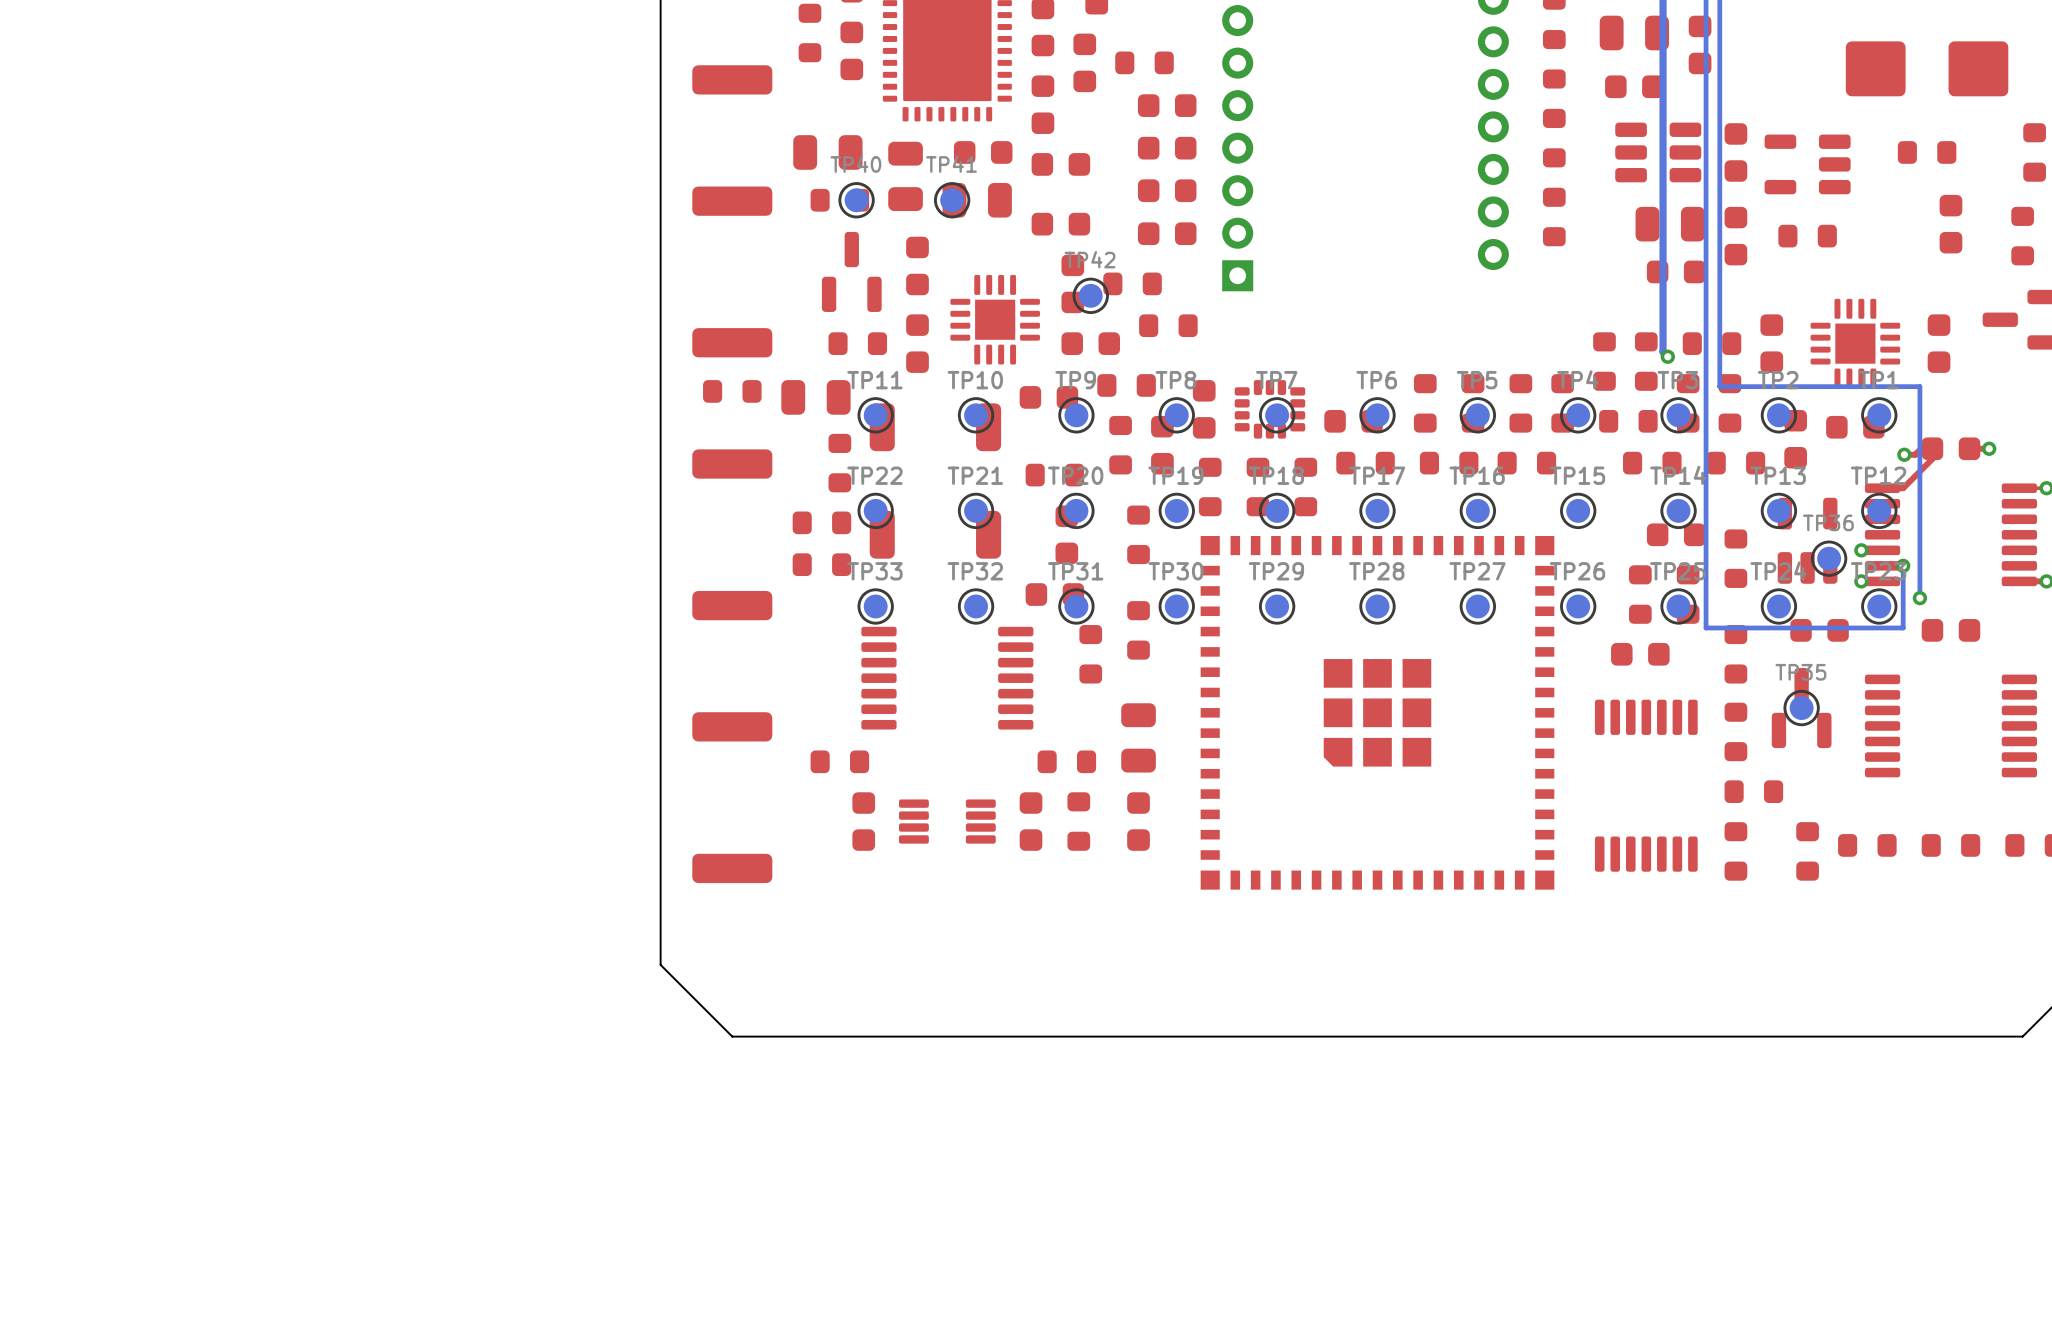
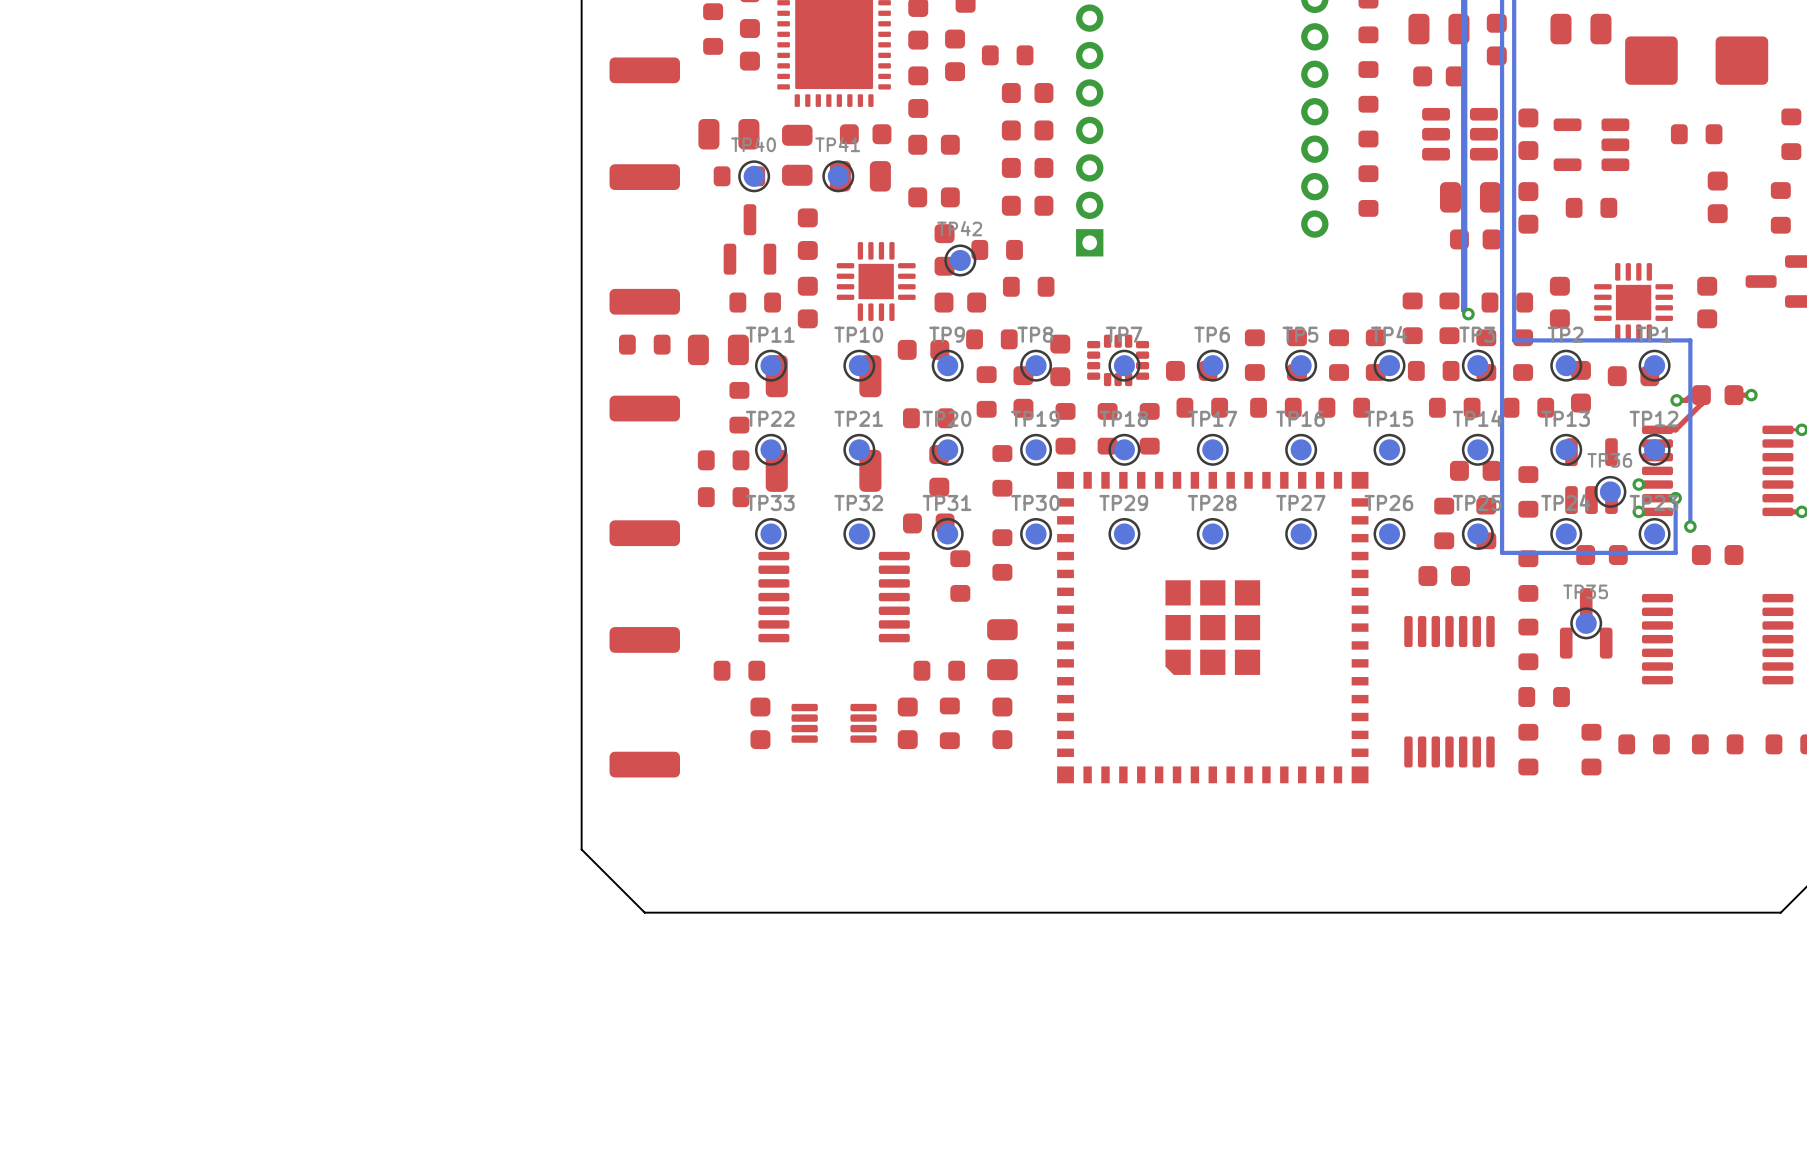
part: none -> (1580, 29)

